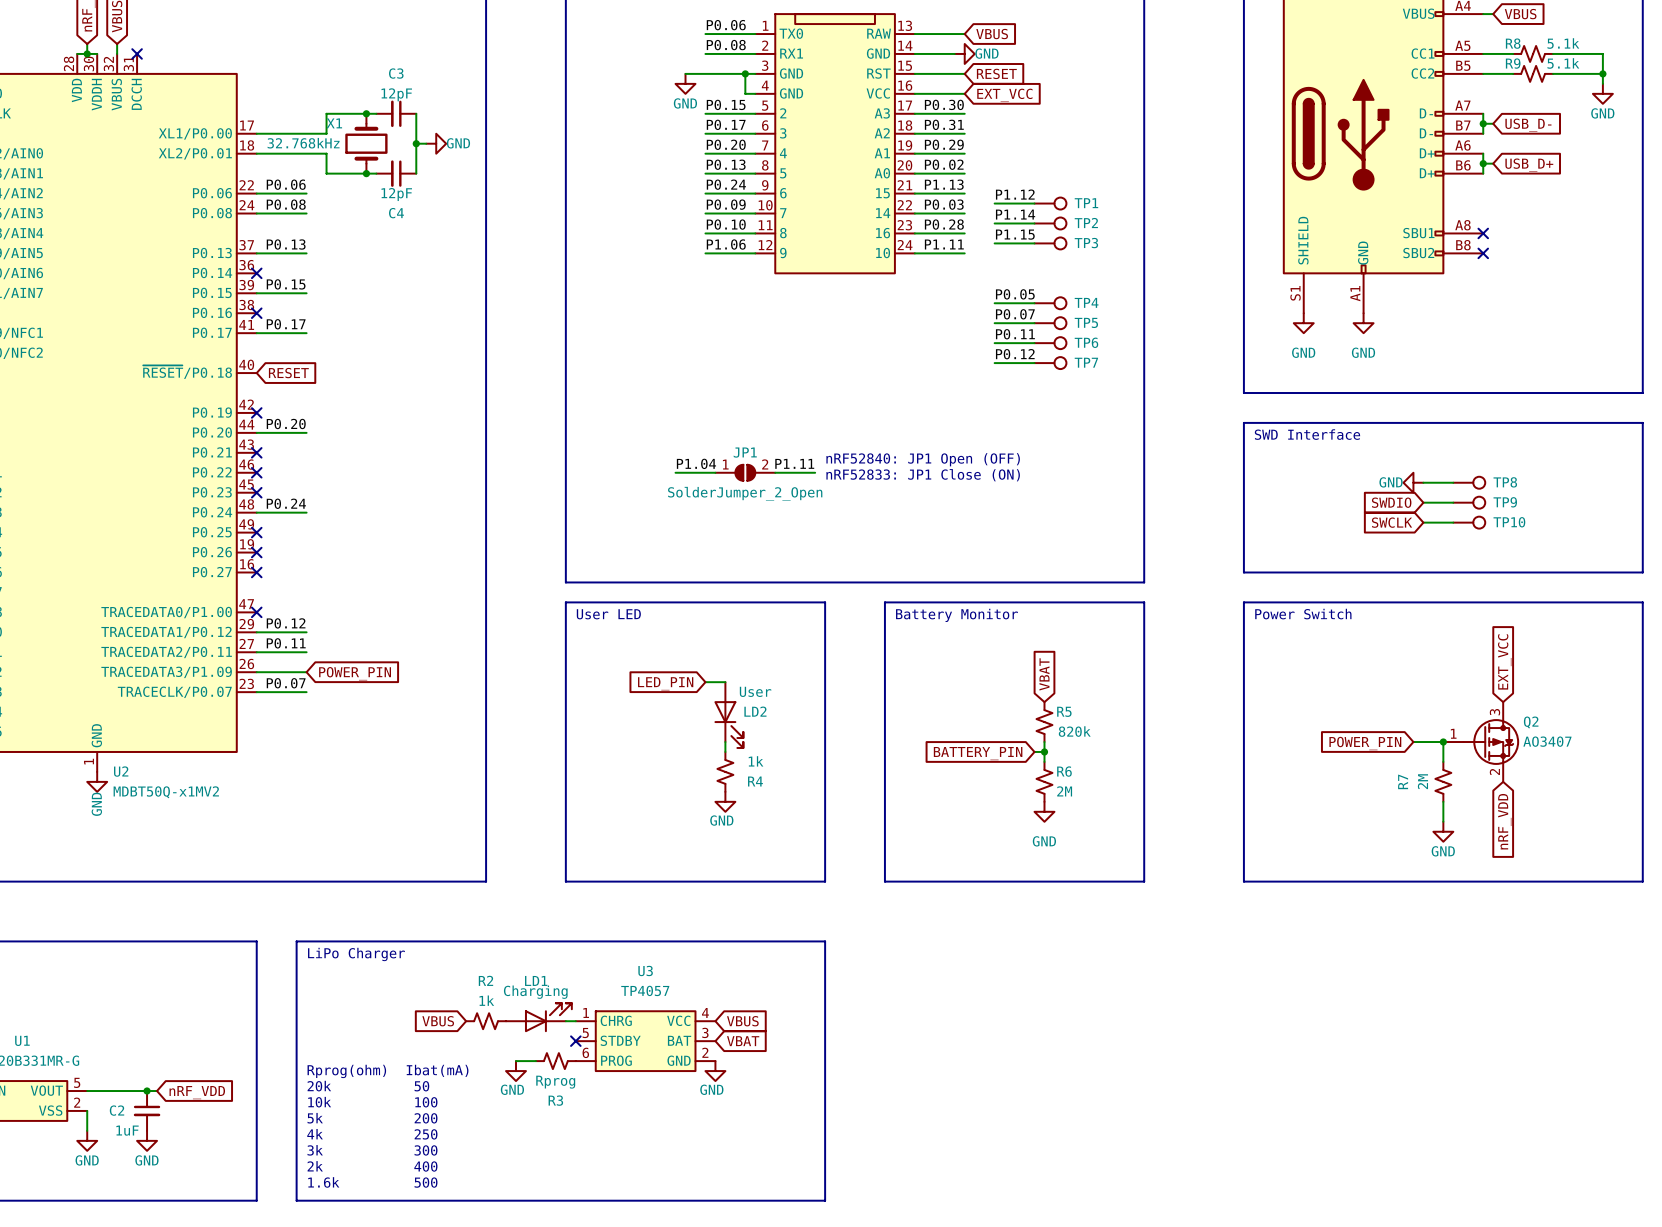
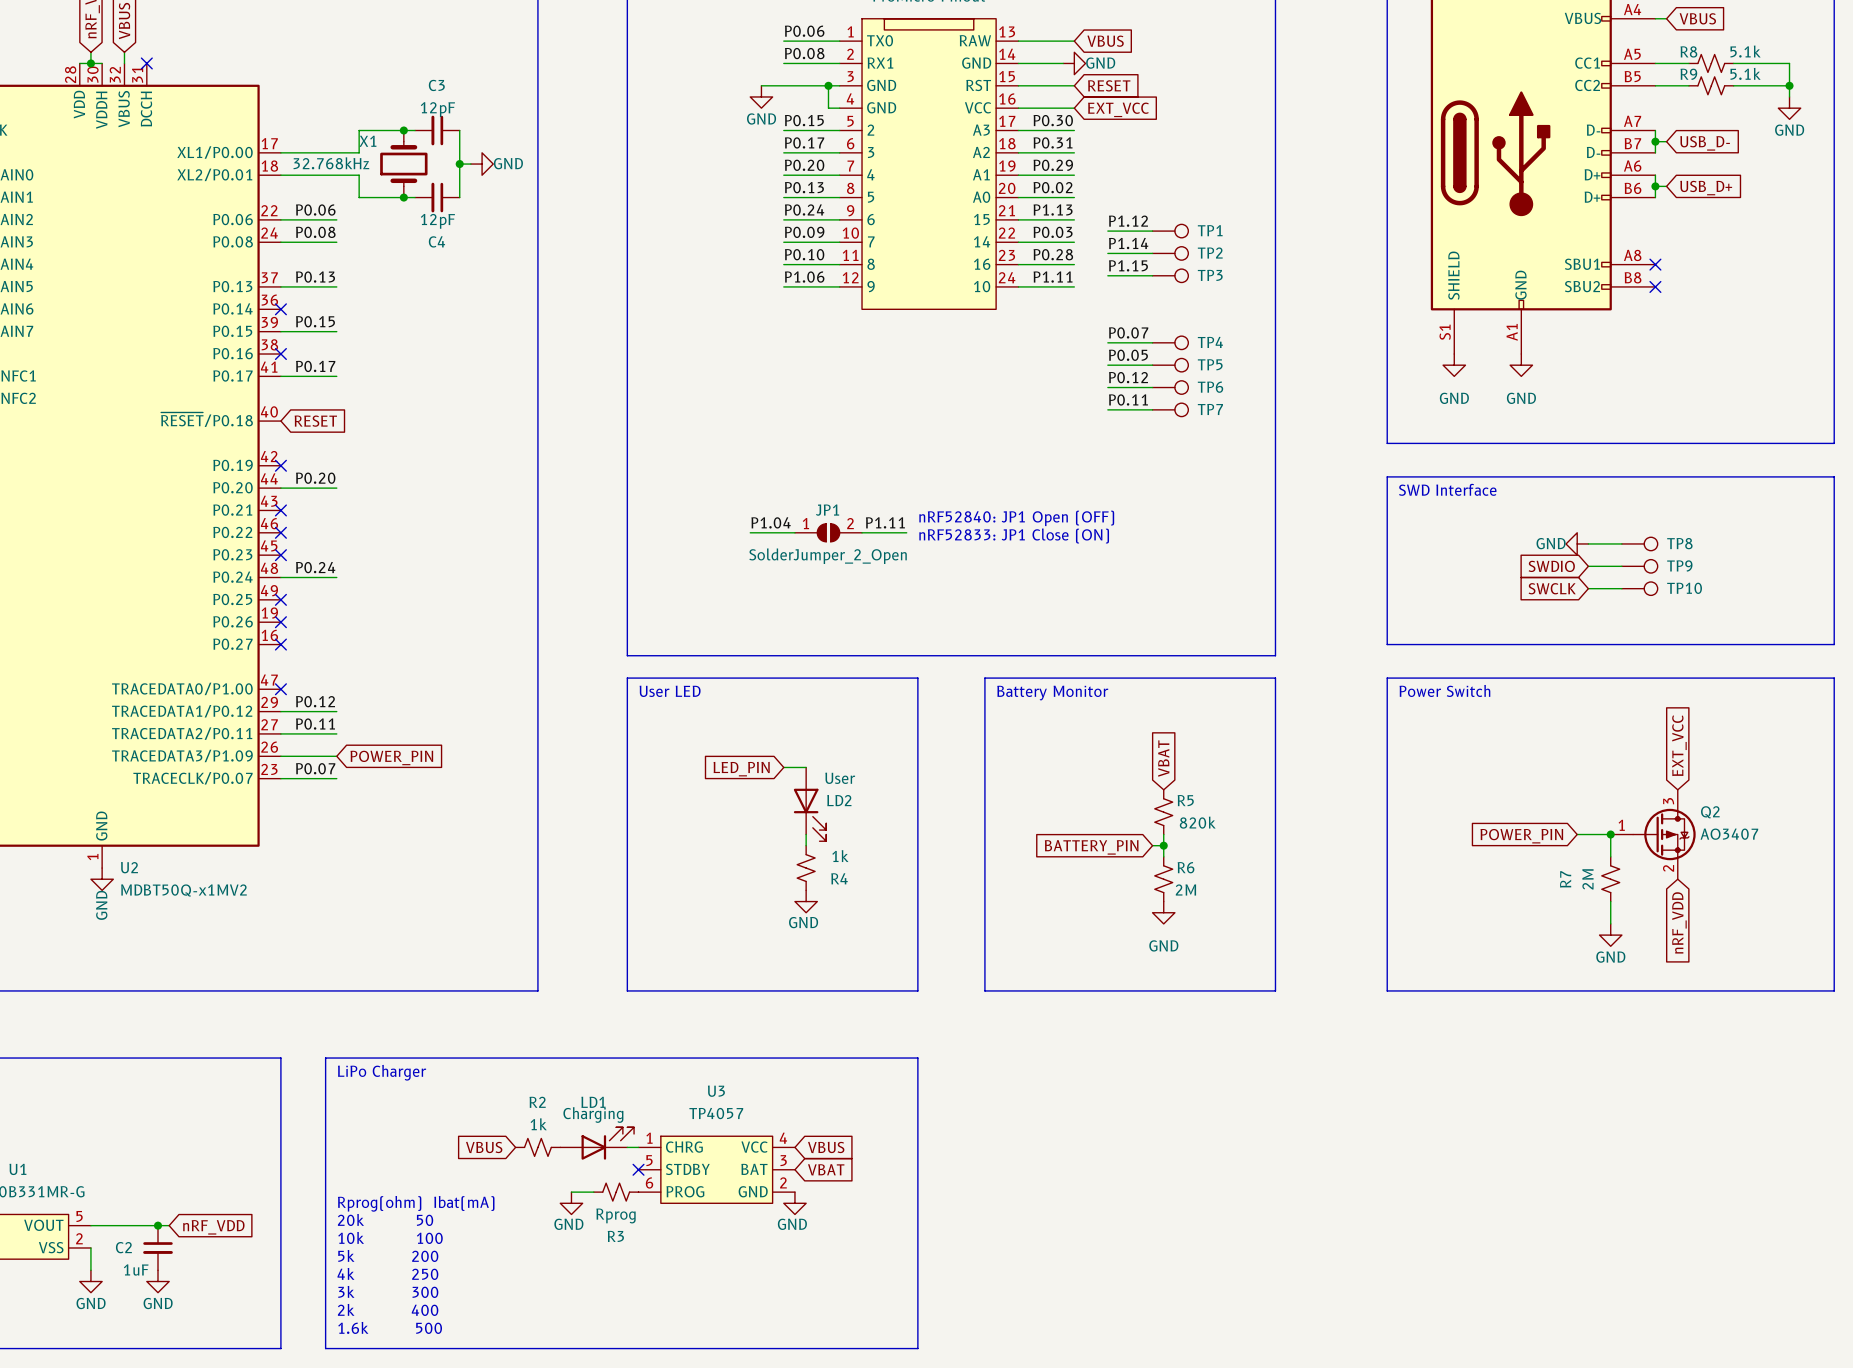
label: P0.05 (1015, 294) -> P0.07 (1128, 332)
label: P0.07 (1015, 314) -> P0.05 (1128, 355)
label: P0.11 (1015, 334) -> P0.12 (1128, 377)
label: P0.12 (1015, 354) -> P0.11 (1128, 399)

